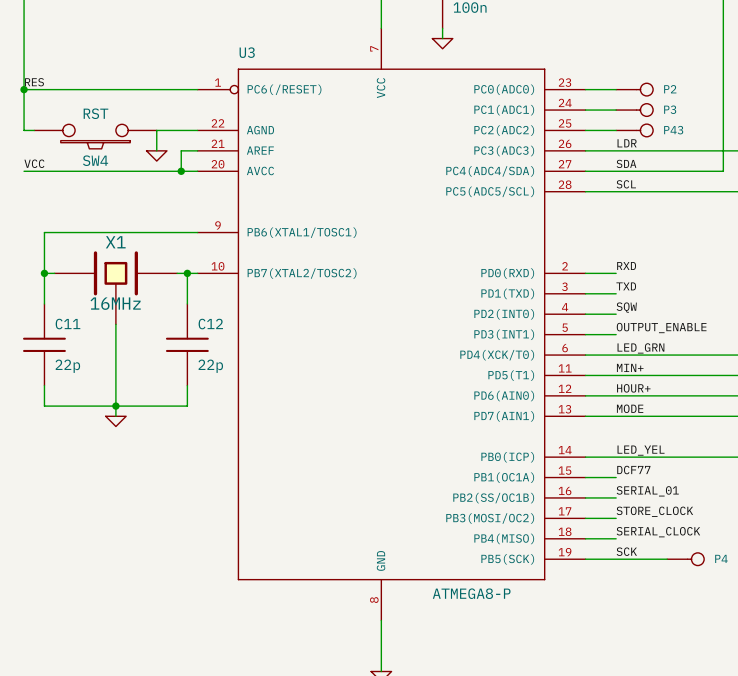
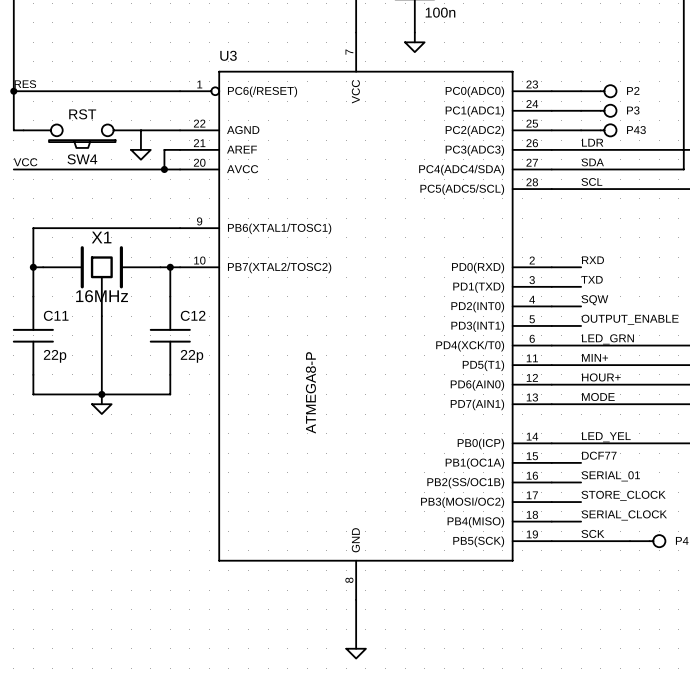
U3 value rotation: 0° (471, 593) -> 90° counterclockwise (310, 392)
U3 value position: ATMEGA8-P (471, 593) -> ATMEGA8-P (310, 392)

